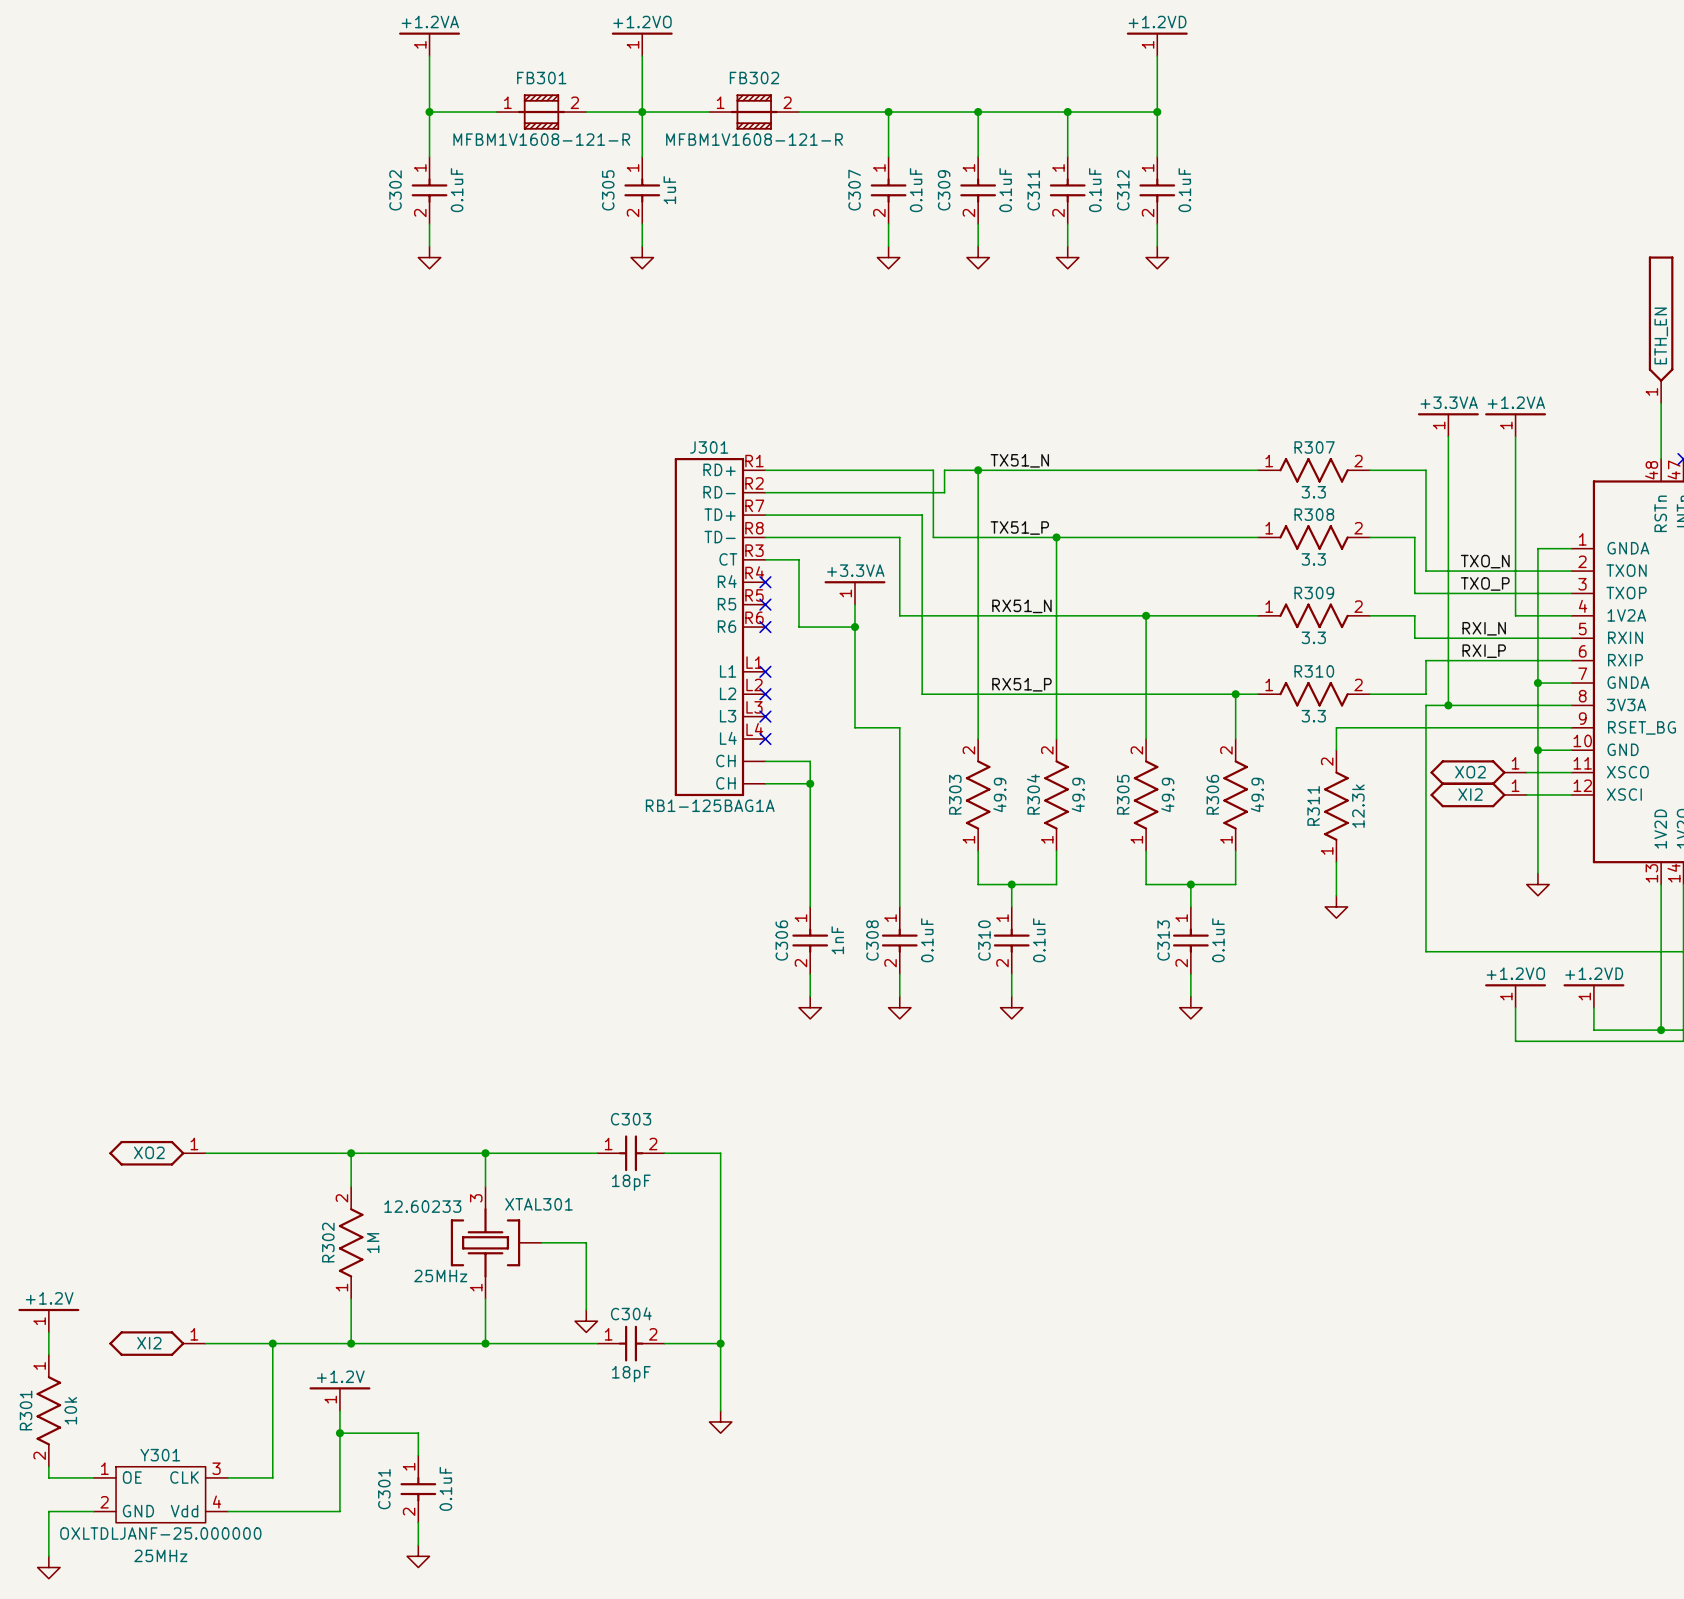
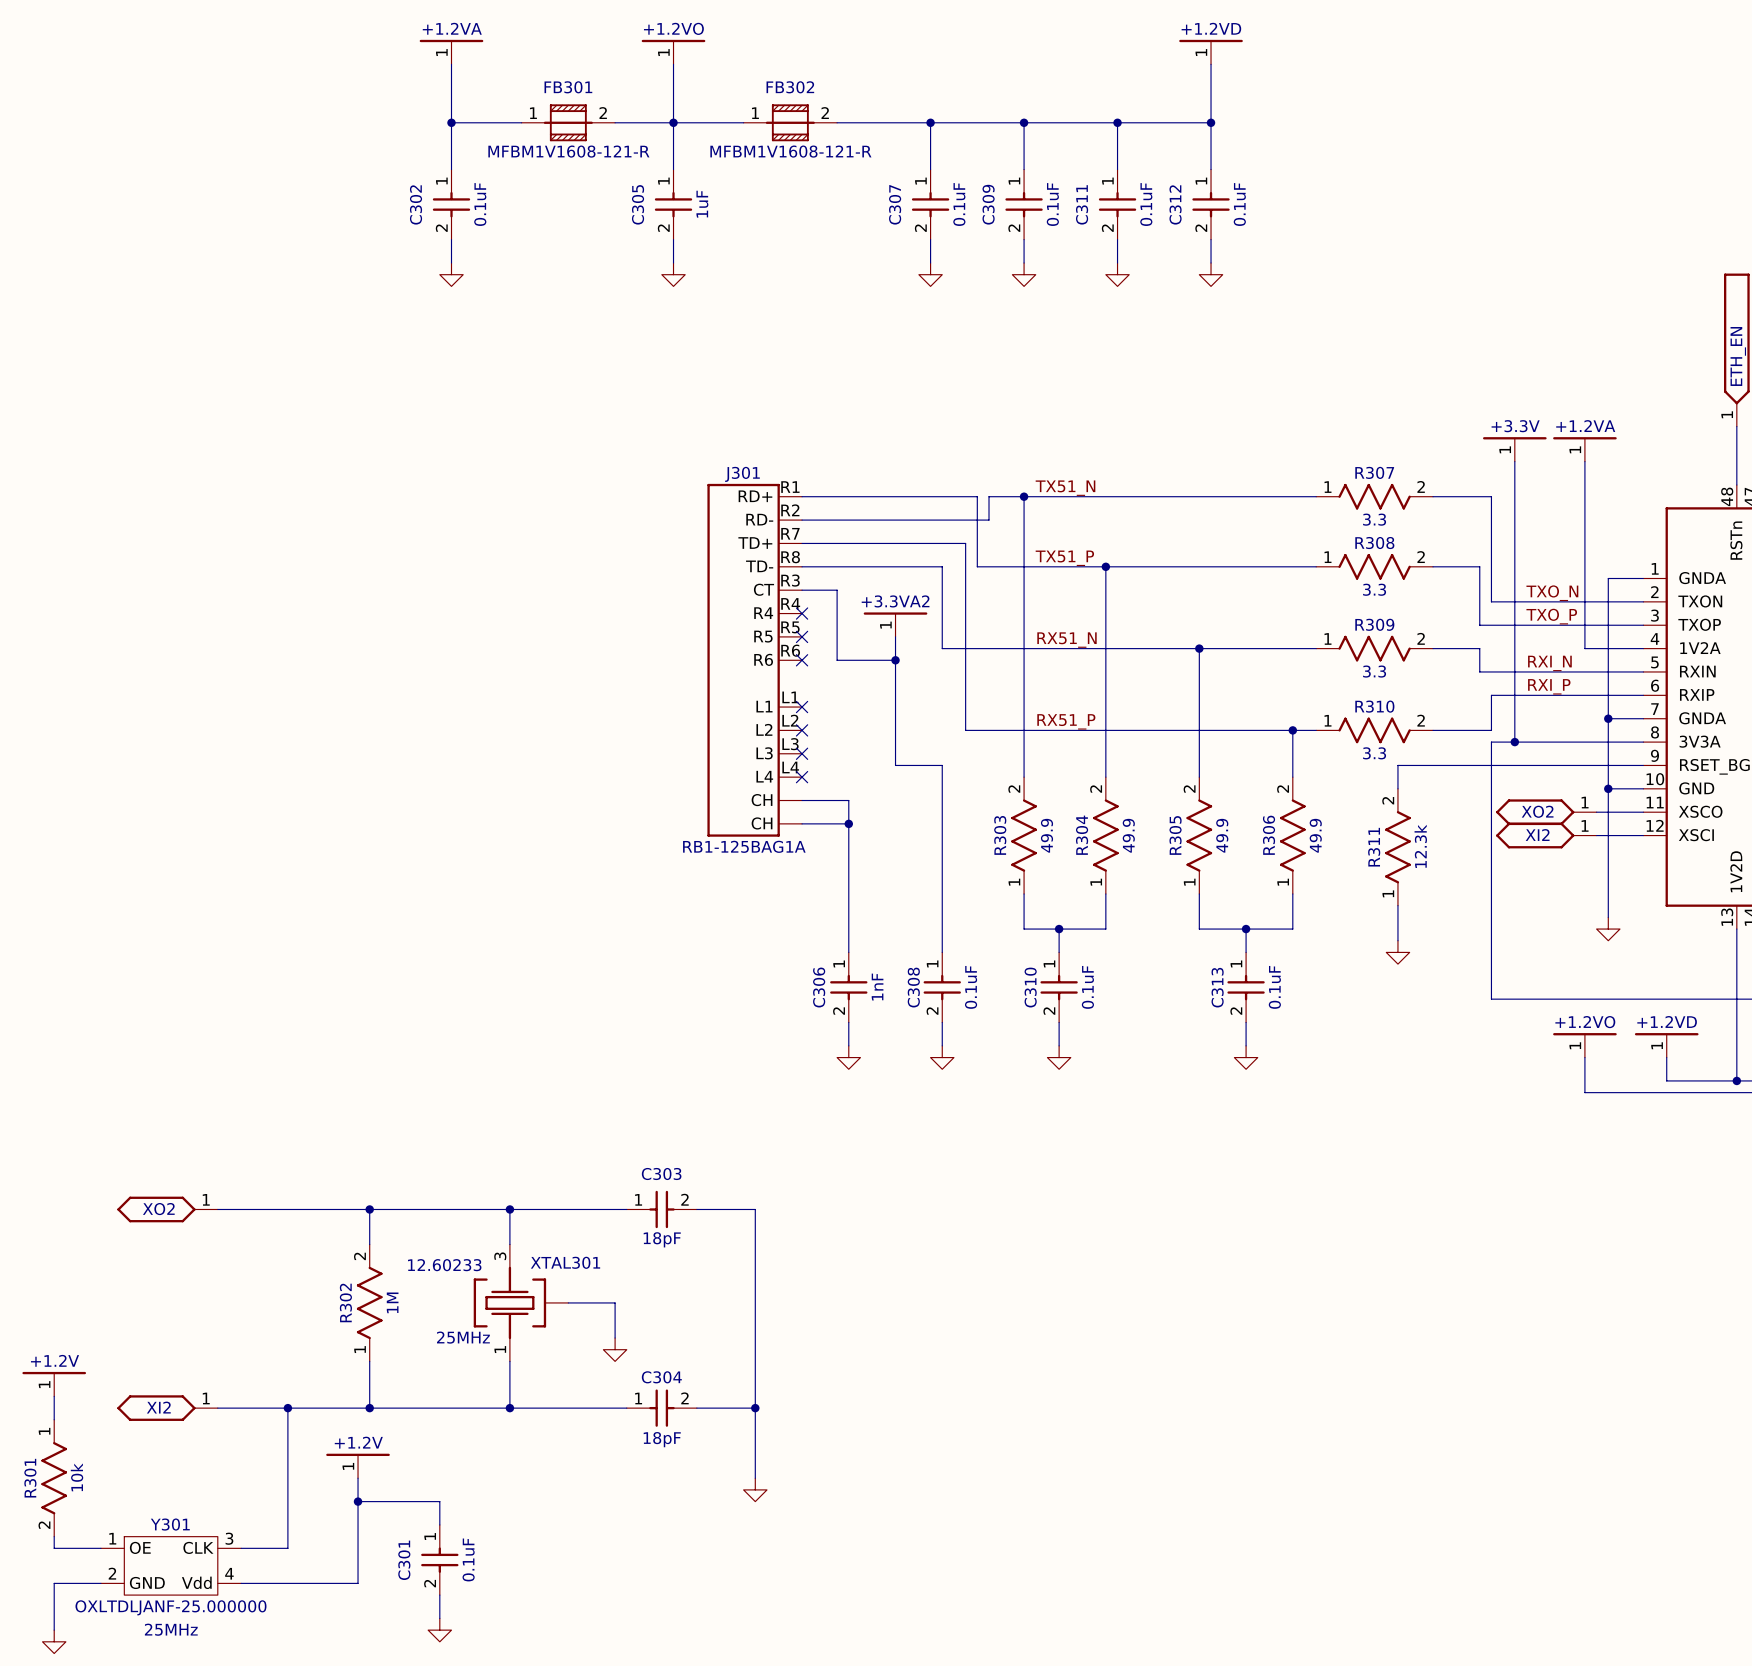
power symbol: +3.3VA (1448, 424) -> +3.3V (1514, 449)
power symbol: +3.3VA (854, 592) -> +3.3VA2 (895, 624)
wire: (586, 1276) (586, 1310) -> none
power symbol position: (586, 1321) -> (615, 1349)

